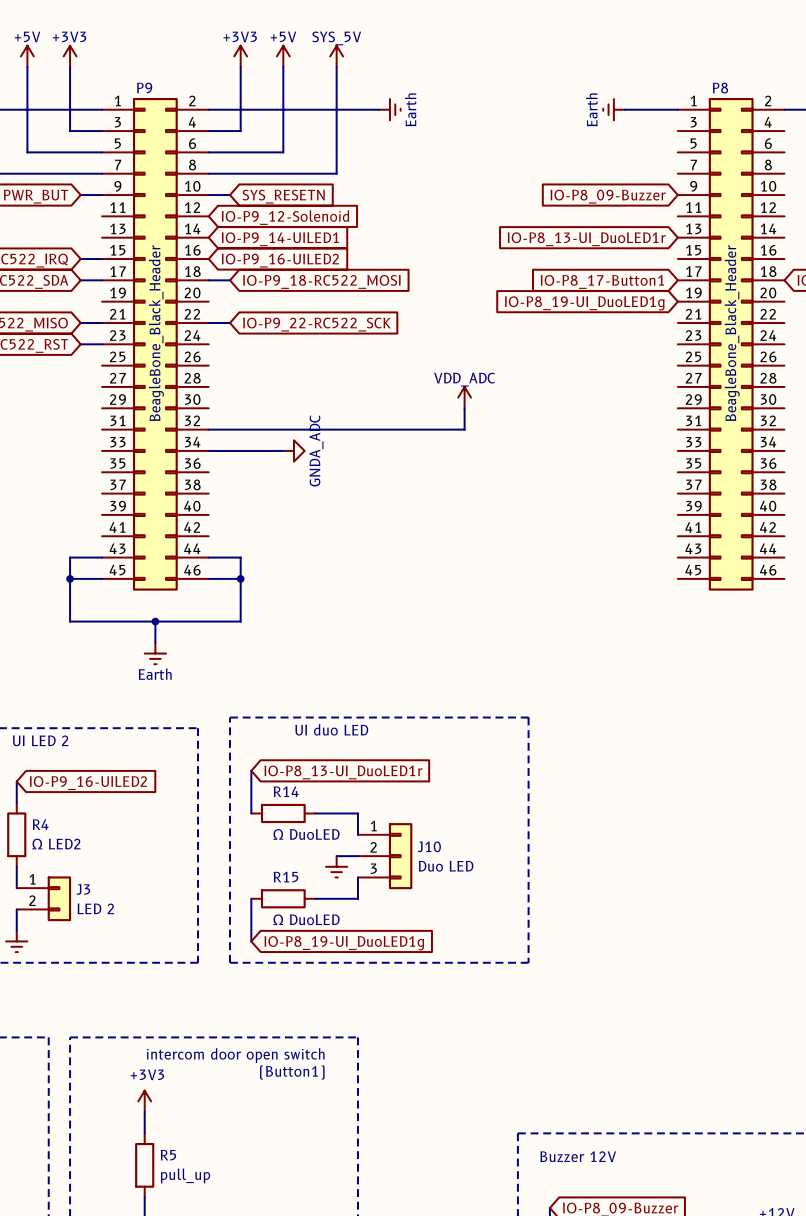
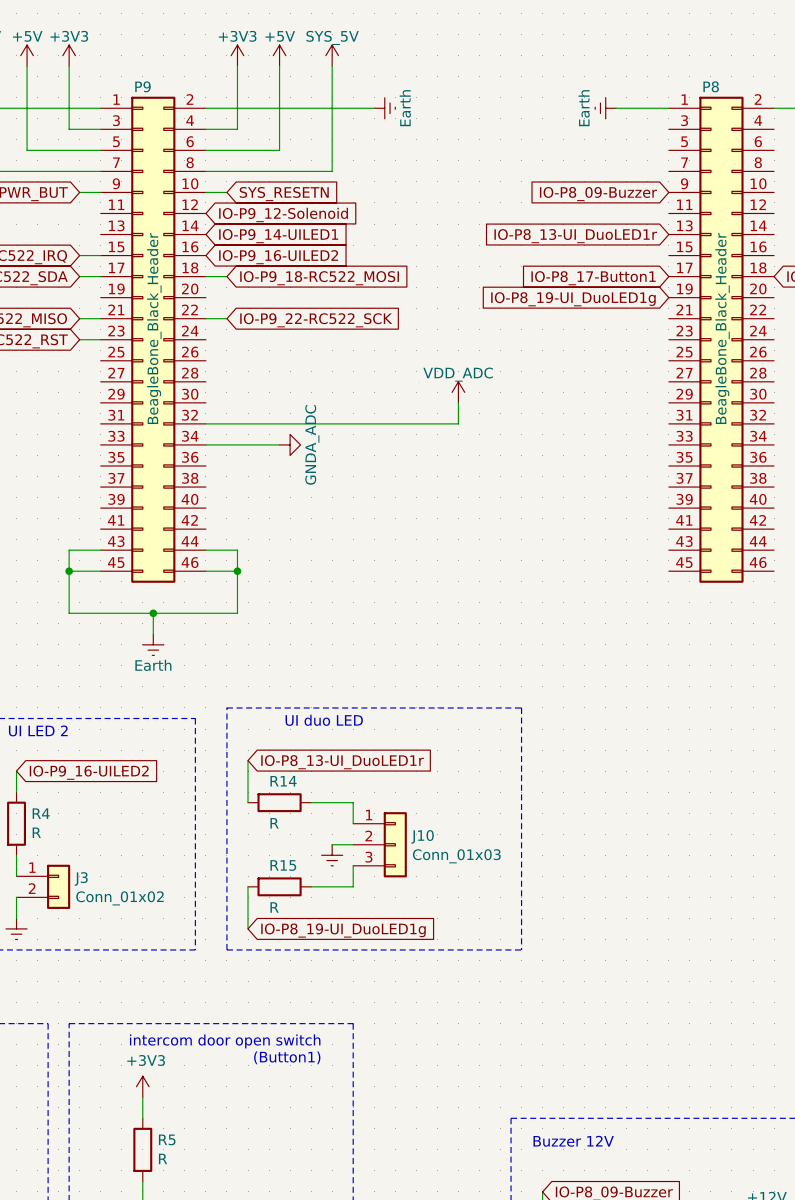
R14 value: Ω DuoLED (306, 834) -> R (274, 823)
R4 value: Ω LED2 (56, 844) -> R (36, 832)
J10 value: Duo LED (446, 866) -> Conn_01x03 (456, 856)
J3 value: LED 2 (95, 908) -> Conn_01x02 (119, 898)
R15 value: Ω DuoLED (306, 919) -> R (274, 907)
R5 value: pull_up (185, 1175) -> R (163, 1158)

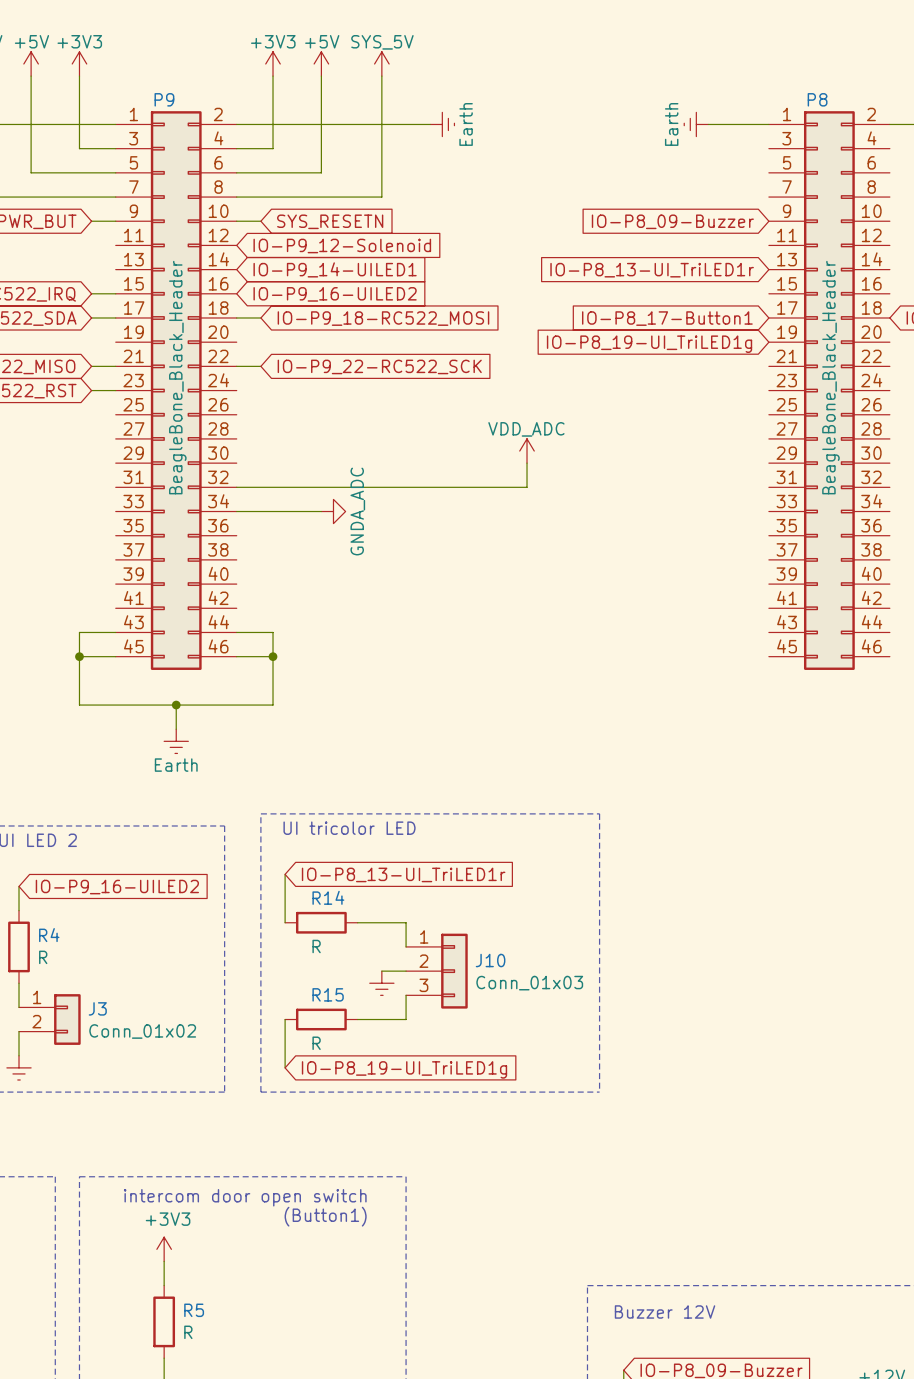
global label: IO-P8_13-UI_DuoLED1r (575, 236) -> IO-P8_13-UI_TriLED1r (652, 270)
global label: IO-P8_19-UI_DuoLED1g (573, 299) -> IO-P8_19-UI_TriLED1g (649, 344)
text: UI duo LED (324, 720) -> UI tricolor LED (349, 828)
global label: IO-P8_13-UI_DuoLED1r (342, 762) -> IO-P8_13-UI_TriLED1r (403, 874)
global label: IO-P8_19-UI_DuoLED1g (343, 930) -> IO-P8_19-UI_TriLED1g (404, 1069)

